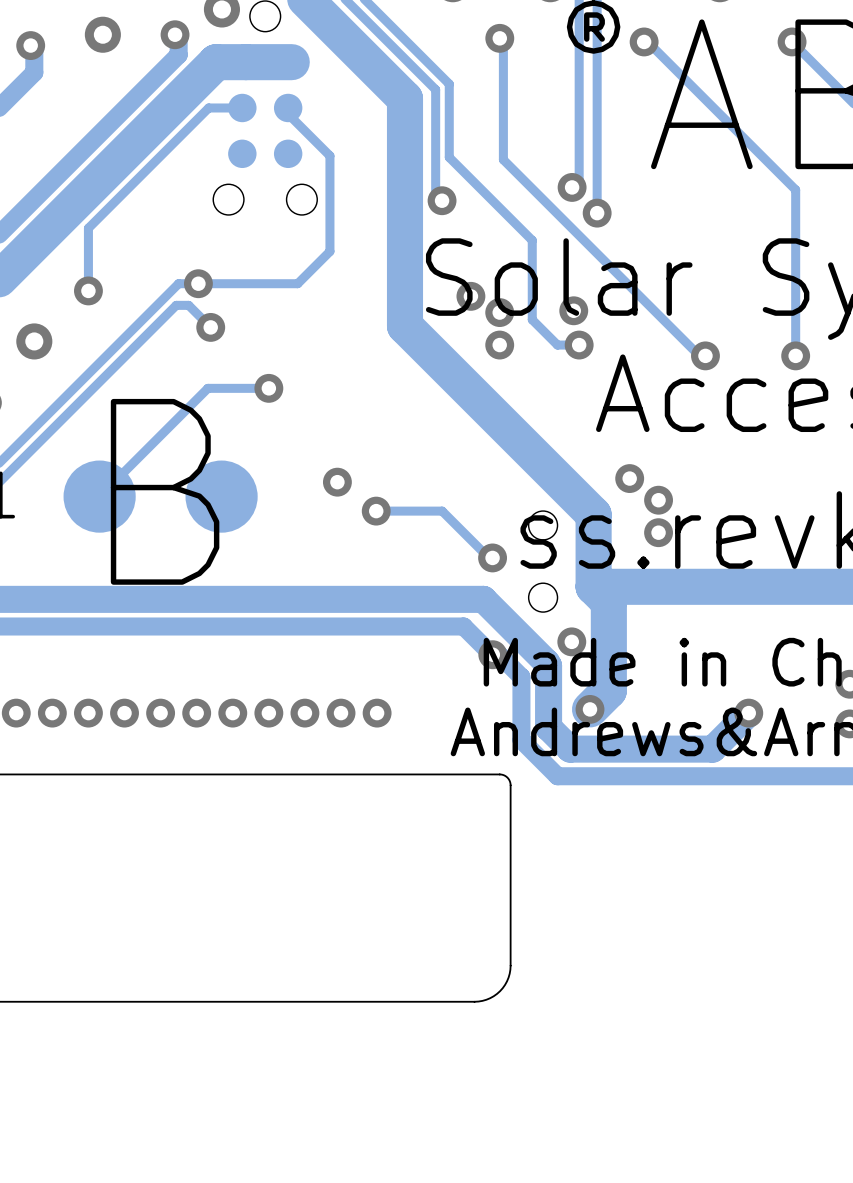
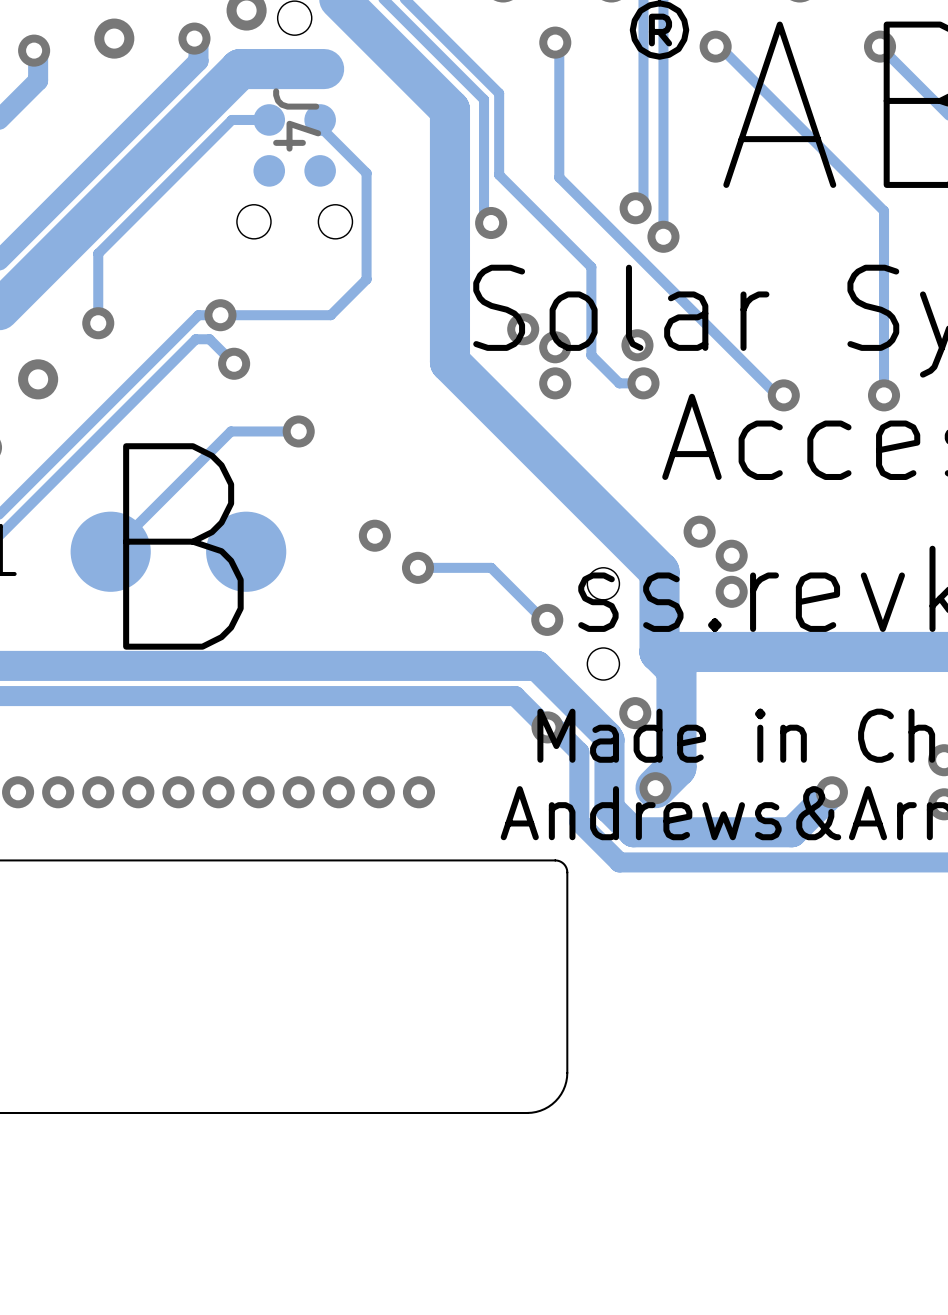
J4 name: none -> J4 (297, 119)

